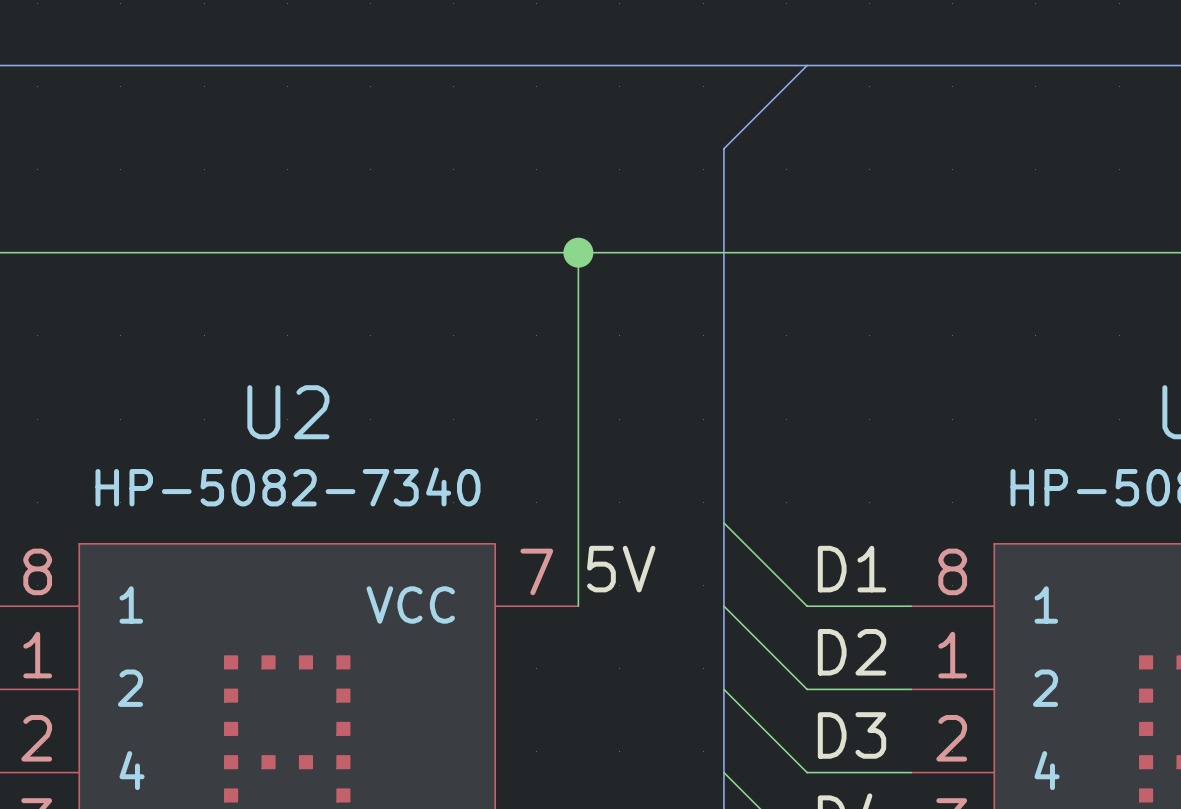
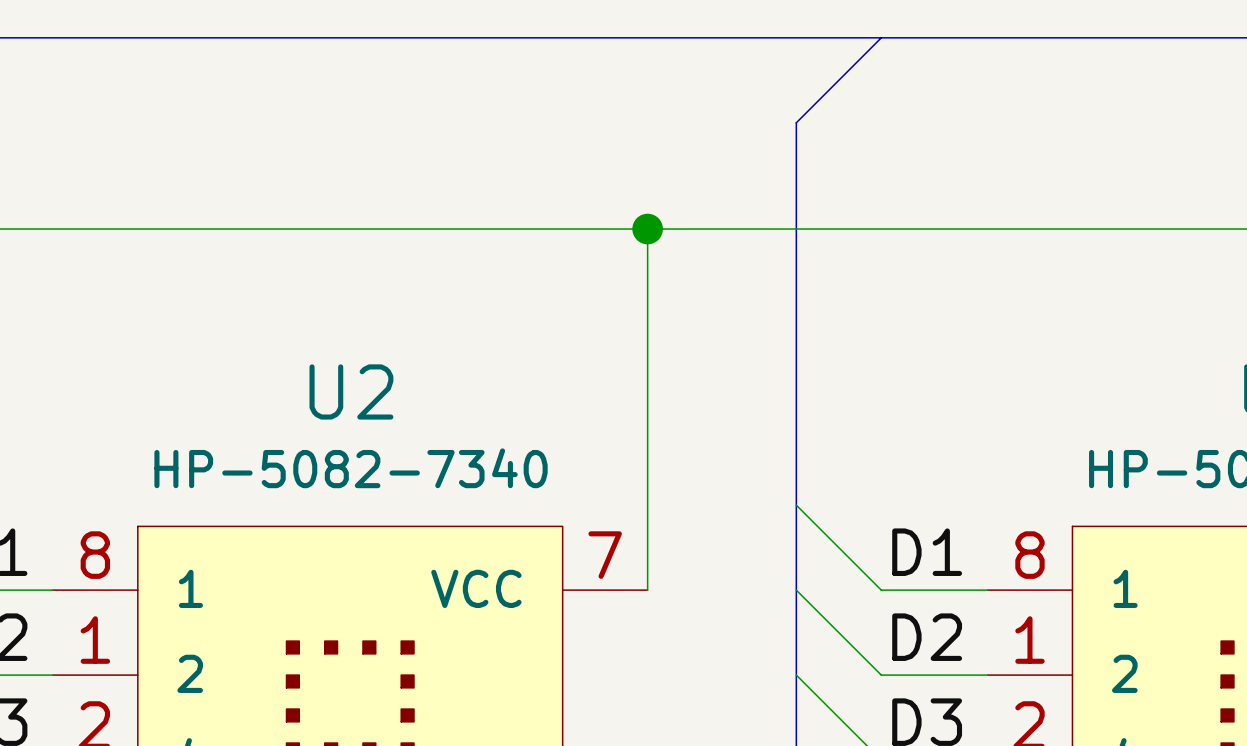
label: 5V (621, 569) -> none

